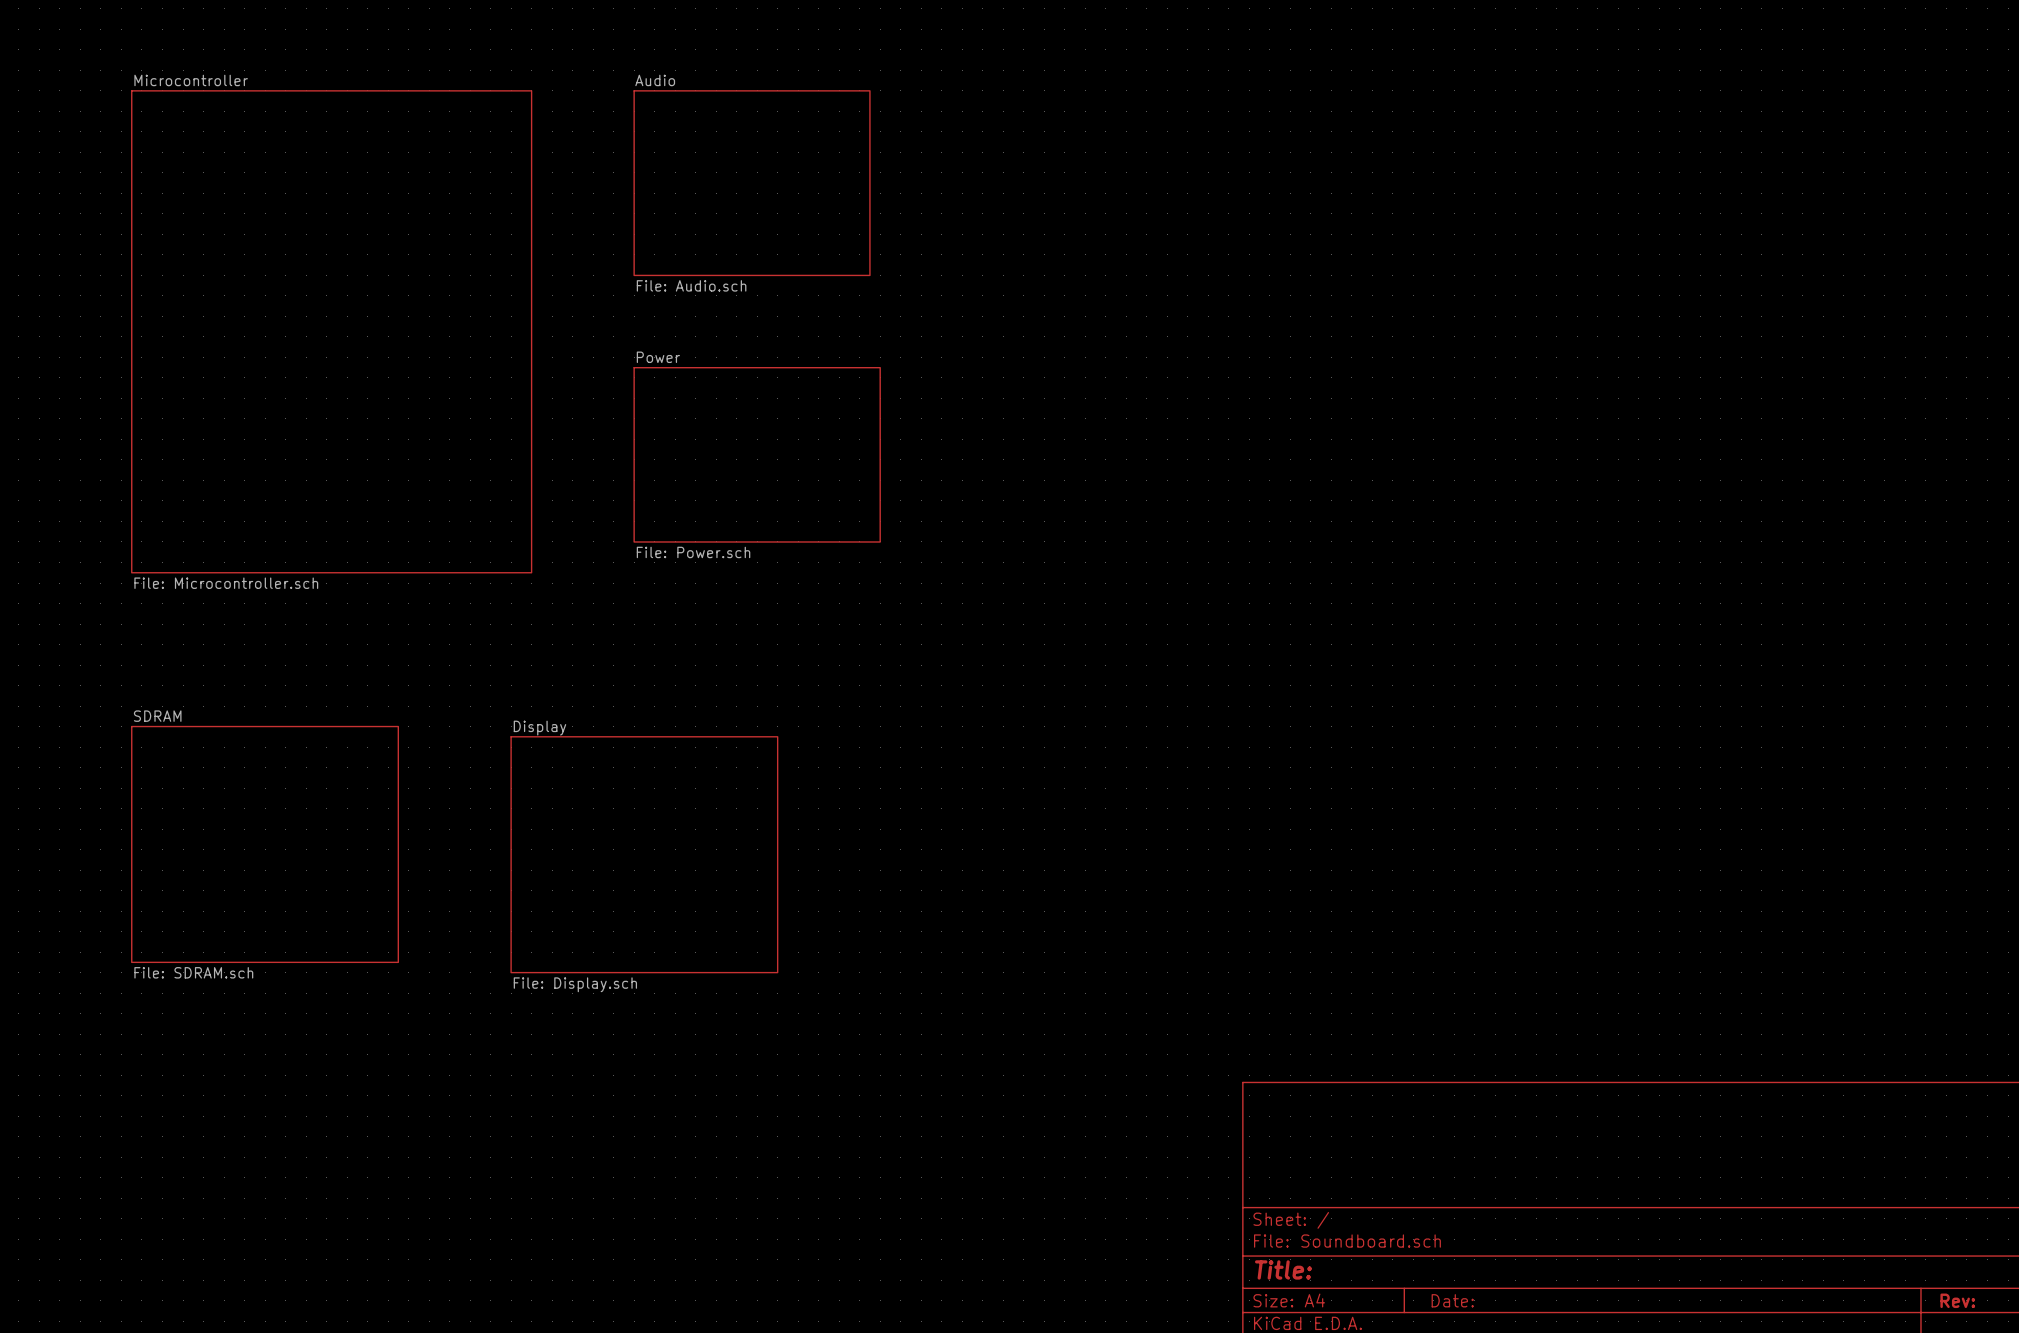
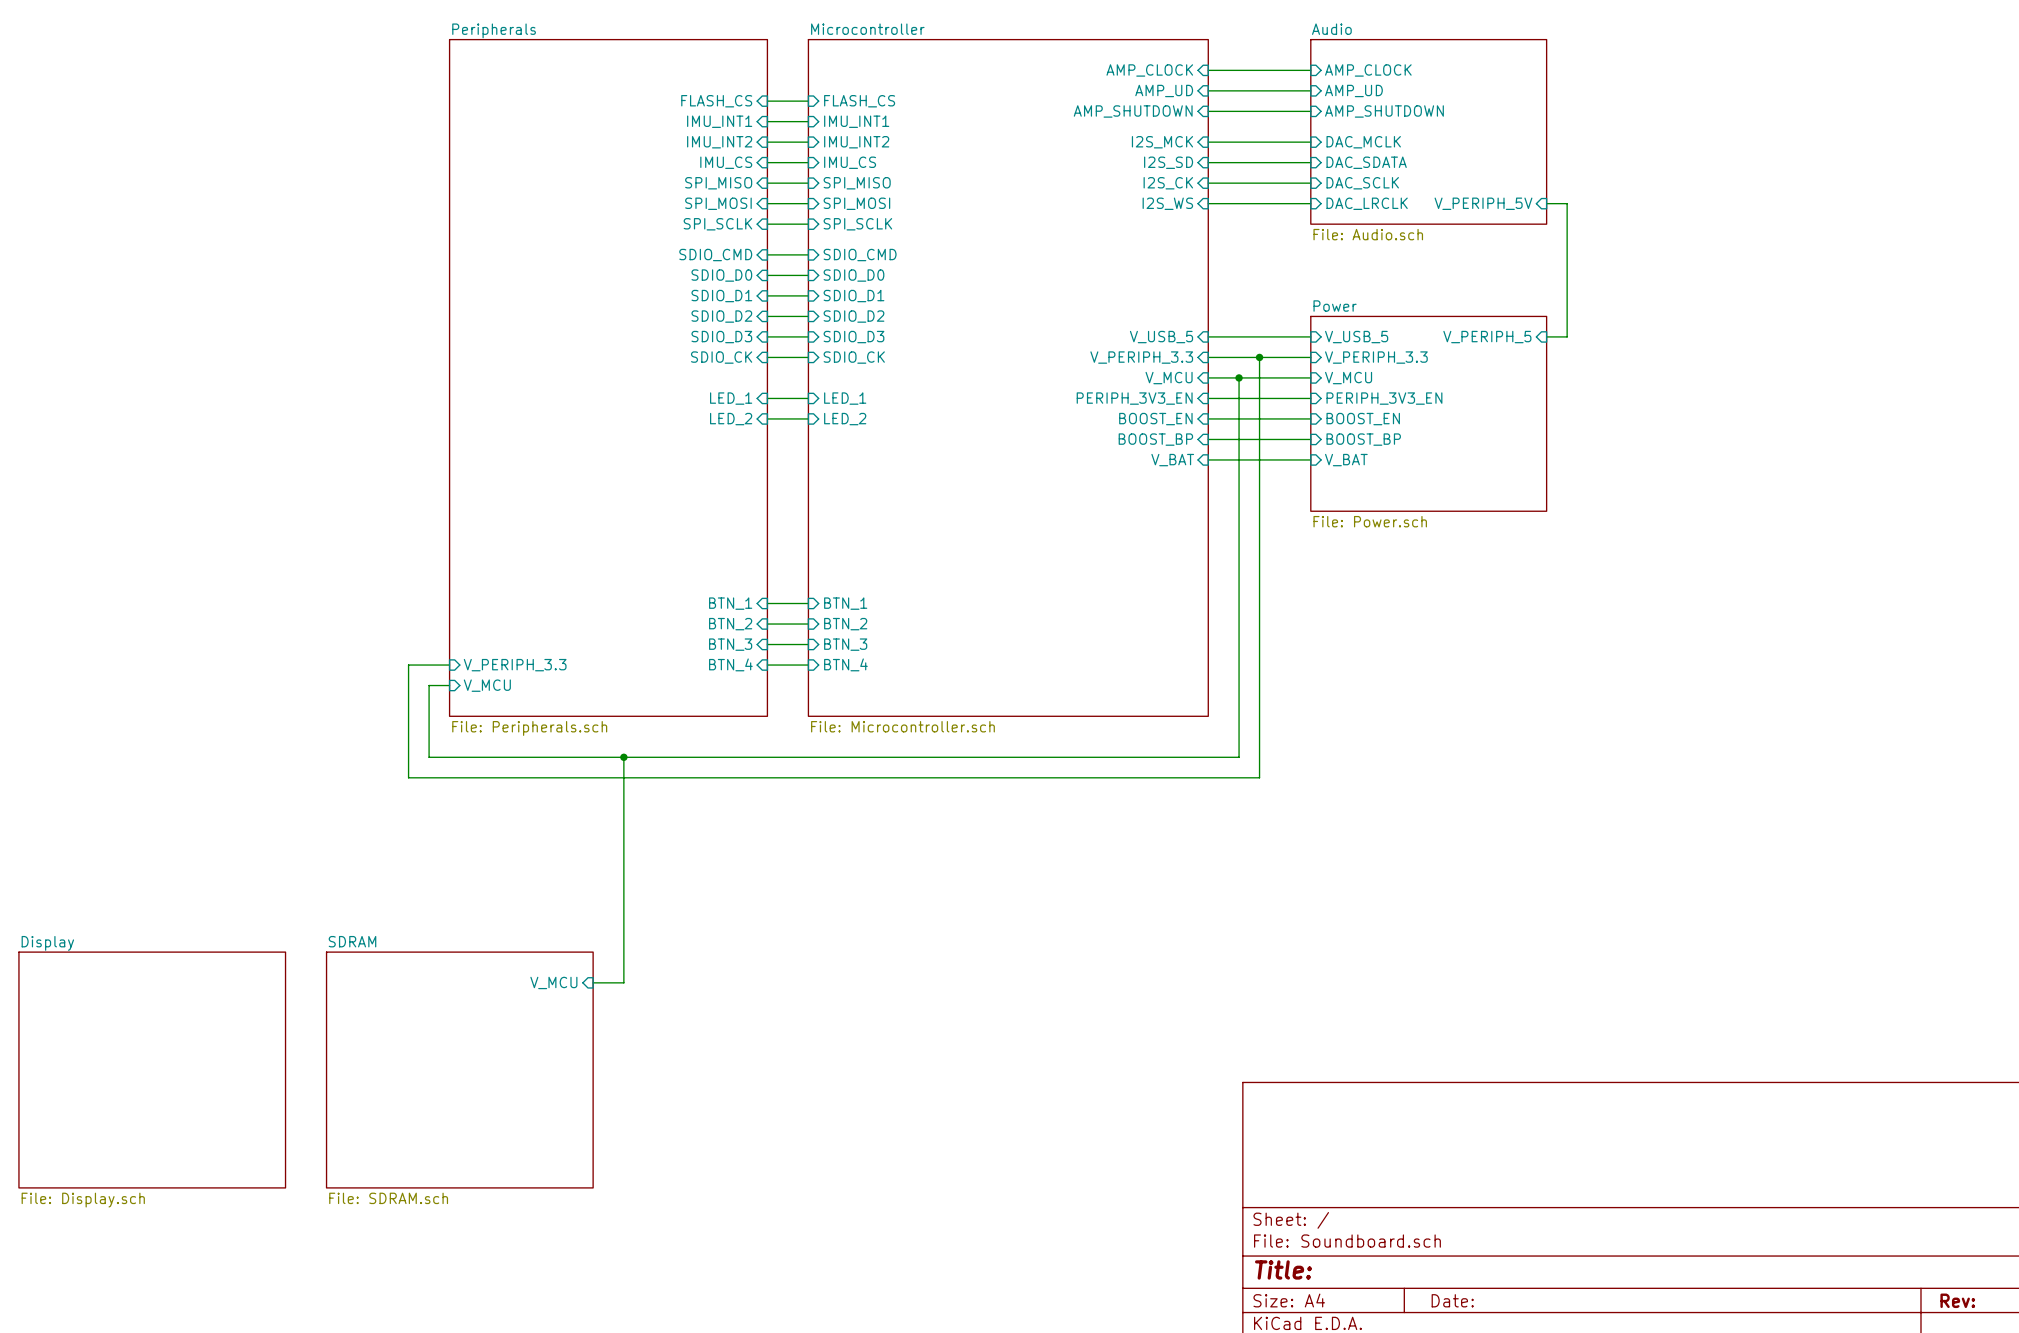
sheet pin: none -> AMP_CLOCK (1149, 70)
wire: none -> (1208, 70) (1310, 70)
sheet pin: none -> AMP_CLOCK (1368, 70)
sheet pin: none -> AMP_UD (1164, 90)
wire: none -> (1208, 90) (1310, 90)
sheet pin: none -> AMP_UD (1353, 90)
sheet pin: none -> FLASH_CS (716, 101)
wire: none -> (767, 101) (808, 101)
sheet pin: none -> FLASH_CS (859, 101)
sheet pin: none -> AMP_SHUTDOWN (1133, 111)
wire: none -> (1208, 111) (1310, 111)
sheet pin: none -> AMP_SHUTDOWN (1384, 111)
sheet pin: none -> IMU_INT1 (719, 121)
wire: none -> (767, 121) (808, 121)
sheet pin: none -> IMU_INT1 (856, 121)
sheet Audio: none -> File: Audio.sch (1428, 131)
sheet pin: none -> IMU_INT2 (719, 142)
wire: none -> (767, 142) (808, 142)
sheet pin: none -> IMU_INT2 (856, 142)
sheet pin: none -> I2S_MCK (1162, 142)
wire: none -> (1208, 142) (1310, 142)
sheet pin: none -> DAC_MCLK (1363, 142)
sheet pin: none -> IMU_CS (726, 162)
wire: none -> (767, 162) (808, 162)
sheet pin: none -> IMU_CS (850, 162)
sheet pin: none -> I2S_SD (1168, 162)
wire: none -> (1208, 162) (1310, 162)
sheet pin: none -> DAC_SDATA (1366, 162)
sheet pin: none -> SPI_MISO (718, 183)
sheet Audio: File: Audio.sch (752, 183) -> none
wire: none -> (767, 183) (808, 183)
sheet pin: none -> SPI_MISO (857, 183)
sheet pin: none -> I2S_CK (1168, 183)
wire: none -> (1208, 183) (1310, 183)
sheet pin: none -> DAC_SCLK (1362, 183)
sheet pin: none -> SPI_MOSI (718, 203)
wire: none -> (767, 203) (808, 203)
sheet pin: none -> SPI_MOSI (856, 203)
sheet pin: none -> I2S_WS (1167, 203)
wire: none -> (1208, 203) (1310, 203)
sheet pin: none -> DAC_LRCLK (1367, 203)
sheet pin: none -> V_PERIPH_5V (1483, 203)
wire: none -> (1546, 203) (1567, 203) (1567, 336) (1546, 336)
sheet pin: none -> SPI_SCLK (717, 224)
wire: none -> (767, 224) (808, 224)
sheet pin: none -> SPI_SCLK (857, 224)
wire: none -> (767, 254) (808, 254)
sheet pin: none -> SDIO_CMD (715, 255)
sheet pin: none -> SDIO_CMD (860, 255)
sheet pin: none -> SDIO_D0 (721, 275)
sheet pin: none -> SDIO_D0 (853, 275)
wire: none -> (767, 295) (808, 295)
sheet pin: none -> SDIO_D1 (721, 296)
sheet pin: none -> SDIO_D1 (853, 296)
sheet pin: none -> SDIO_D2 (721, 316)
wire: none -> (767, 316) (808, 316)
sheet pin: none -> SDIO_D2 (853, 316)
sheet Microcontroller: File: Microcontroller.sch (331, 331) -> none
wire: none -> (767, 336) (808, 336)
wire: none -> (1208, 336) (1310, 336)
sheet pin: none -> SDIO_D3 (721, 337)
sheet pin: none -> SDIO_D3 (853, 337)
sheet pin: none -> V_USB_5 (1161, 337)
sheet pin: none -> V_USB_5 (1356, 337)
sheet pin: none -> V_PERIPH_5 (1487, 337)
sheet pin: none -> SDIO_CK (721, 357)
wire: none -> (767, 357) (808, 357)
sheet pin: none -> SDIO_CK (854, 357)
sheet pin: none -> V_PERIPH_3.3 (1141, 357)
wire: none -> (1208, 357) (1310, 357)
wire: none -> (1259, 357) (1259, 777) (408, 777) (408, 665) (449, 665)
junction: none -> (1259, 357)
sheet pin: none -> V_PERIPH_3.3 (1376, 357)
sheet Peripherals: none -> File: Peripherals.sch (608, 377)
sheet Microcontroller: none -> File: Microcontroller.sch (1008, 377)
wire: none -> (1208, 377) (1310, 377)
wire: none -> (1239, 377) (1239, 757) (429, 757) (429, 685) (449, 685)
junction: none -> (1239, 377)
sheet pin: none -> V_MCU (1169, 378)
sheet pin: none -> V_MCU (1348, 378)
sheet pin: none -> LED_1 (731, 398)
wire: none -> (767, 398) (808, 398)
sheet pin: none -> LED_1 (845, 398)
sheet pin: none -> PERIPH_3V3_EN (1134, 398)
wire: none -> (1208, 398) (1310, 398)
sheet pin: none -> PERIPH_3V3_EN (1384, 398)
sheet Power: none -> File: Power.sch (1428, 413)
wire: none -> (767, 418) (808, 418)
wire: none -> (1208, 418) (1310, 418)
sheet pin: none -> LED_2 (731, 419)
sheet pin: none -> LED_2 (845, 419)
sheet pin: none -> BOOST_EN (1155, 419)
sheet pin: none -> BOOST_EN (1363, 419)
sheet pin: none -> BOOST_BP (1155, 439)
wire: none -> (1208, 439) (1310, 439)
sheet pin: none -> BOOST_BP (1363, 439)
sheet Power: File: Power.sch (757, 454) -> none
wire: none -> (1208, 459) (1310, 459)
sheet pin: none -> V_BAT (1172, 460)
sheet pin: none -> V_BAT (1346, 460)
sheet pin: none -> BTN_1 (730, 603)
wire: none -> (767, 603) (808, 603)
sheet pin: none -> BTN_1 (845, 603)
sheet pin: none -> BTN_2 (730, 624)
wire: none -> (767, 624) (808, 624)
sheet pin: none -> BTN_2 (845, 624)
sheet pin: none -> BTN_3 (730, 644)
wire: none -> (767, 644) (808, 644)
sheet pin: none -> BTN_3 (845, 644)
sheet pin: none -> BTN_4 (730, 664)
sheet pin: none -> BTN_4 (845, 664)
sheet pin: none -> V_PERIPH_3.3 (515, 665)
wire: none -> (767, 665) (808, 665)
sheet pin: none -> V_MCU (487, 685)
wire: none -> (623, 757) (623, 982) (593, 982)
junction: none -> (623, 757)
sheet SDRAM: File: SDRAM.sch (265, 844) -> none
sheet Display: File: Display.sch (644, 854) -> none
sheet pin: none -> V_MCU (553, 982)
sheet Display: none -> File: Display.sch (152, 1070)
sheet SDRAM: none -> File: SDRAM.sch (459, 1070)

